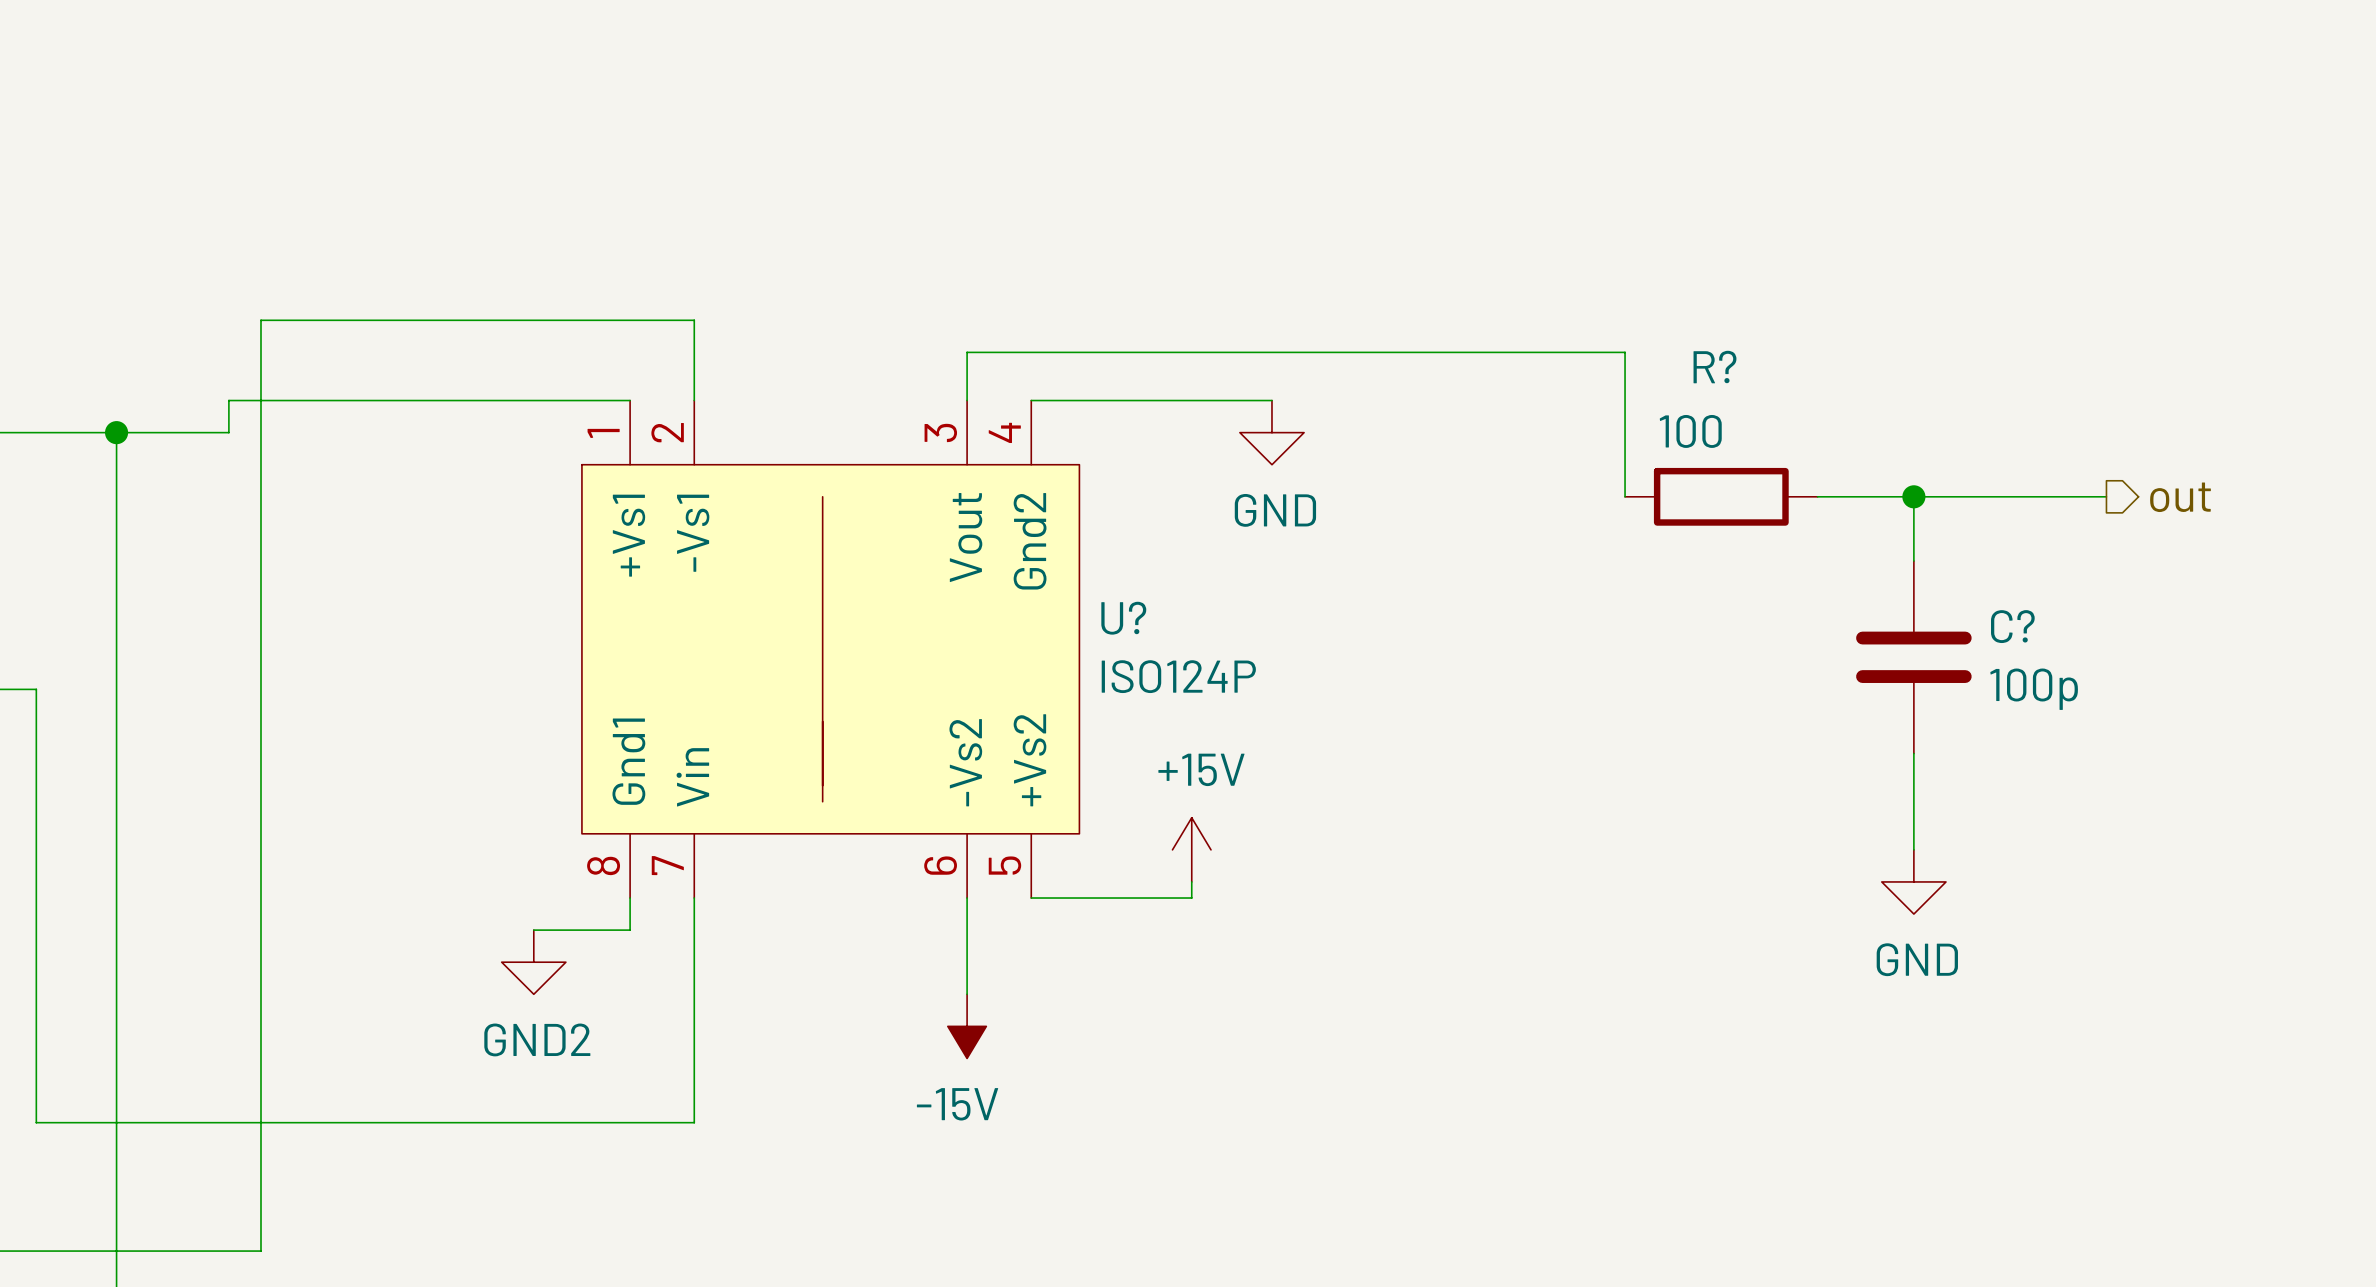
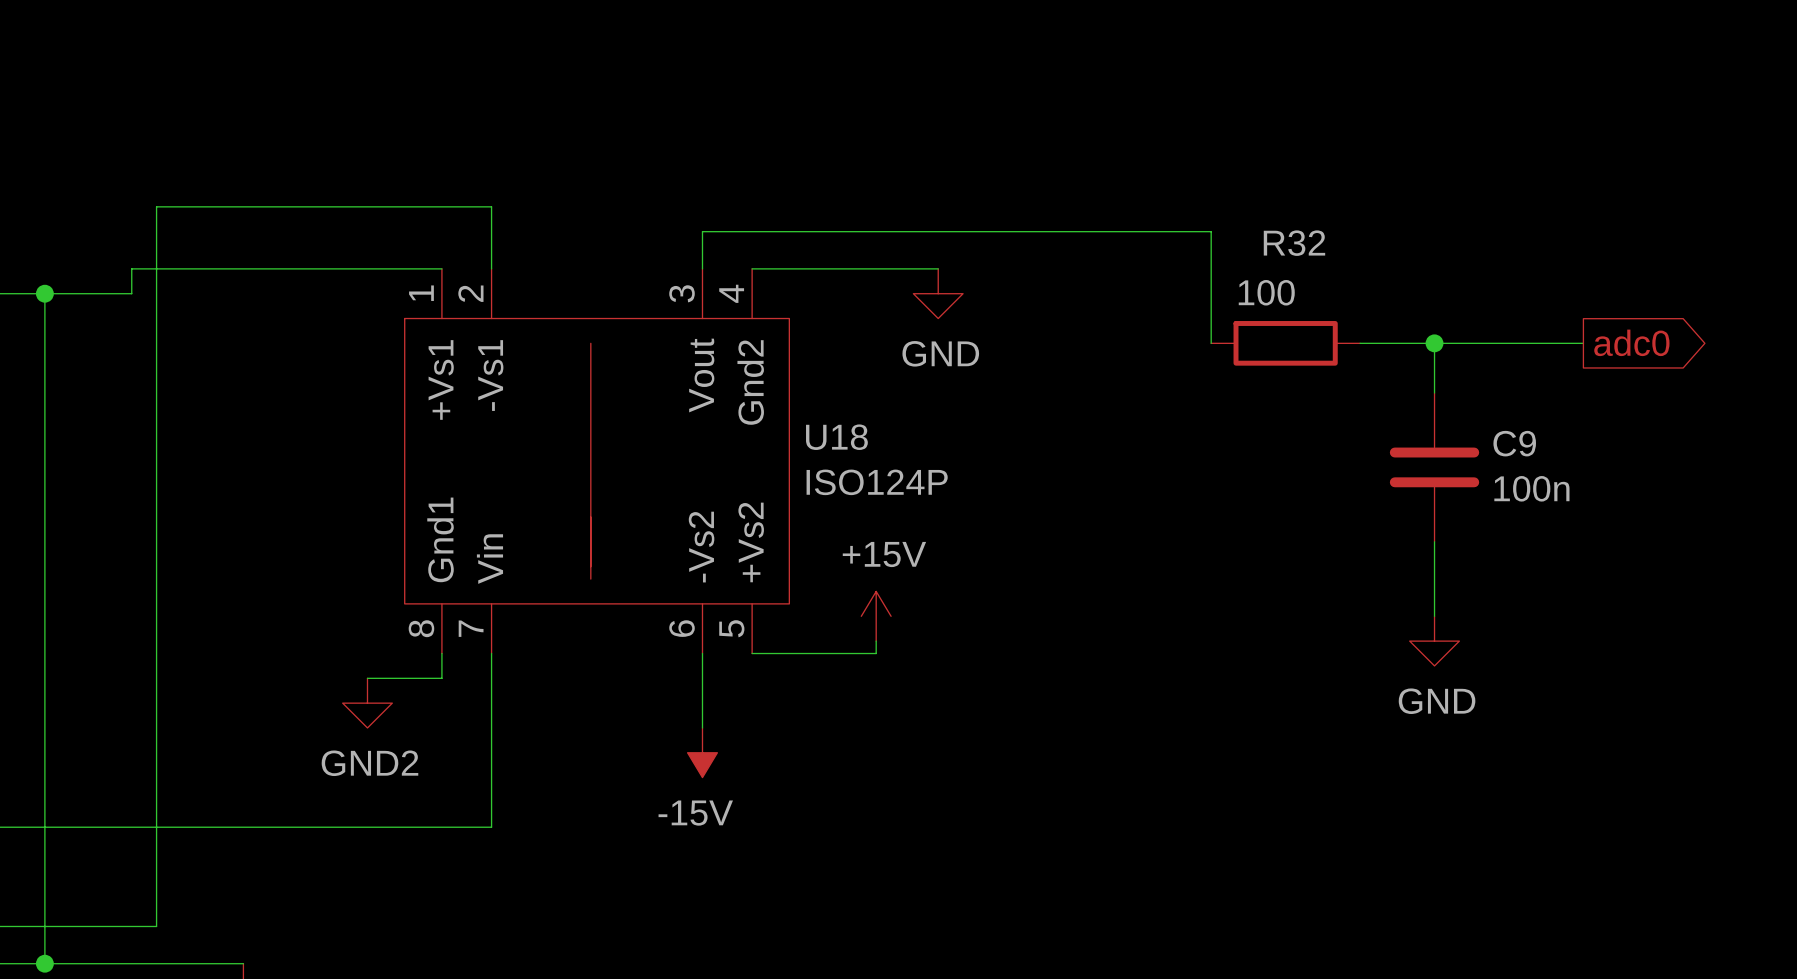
R? name: R? (1714, 367) -> R32 (1294, 243)
global label: none -> adc0 (1631, 342)
hierarchical label: out (2180, 497) -> none
U? name: U? (1123, 618) -> U18 (836, 437)
C? name: C? (2012, 626) -> C9 (1514, 443)
C? value: 100p (2034, 689) -> 100n (1531, 488)

